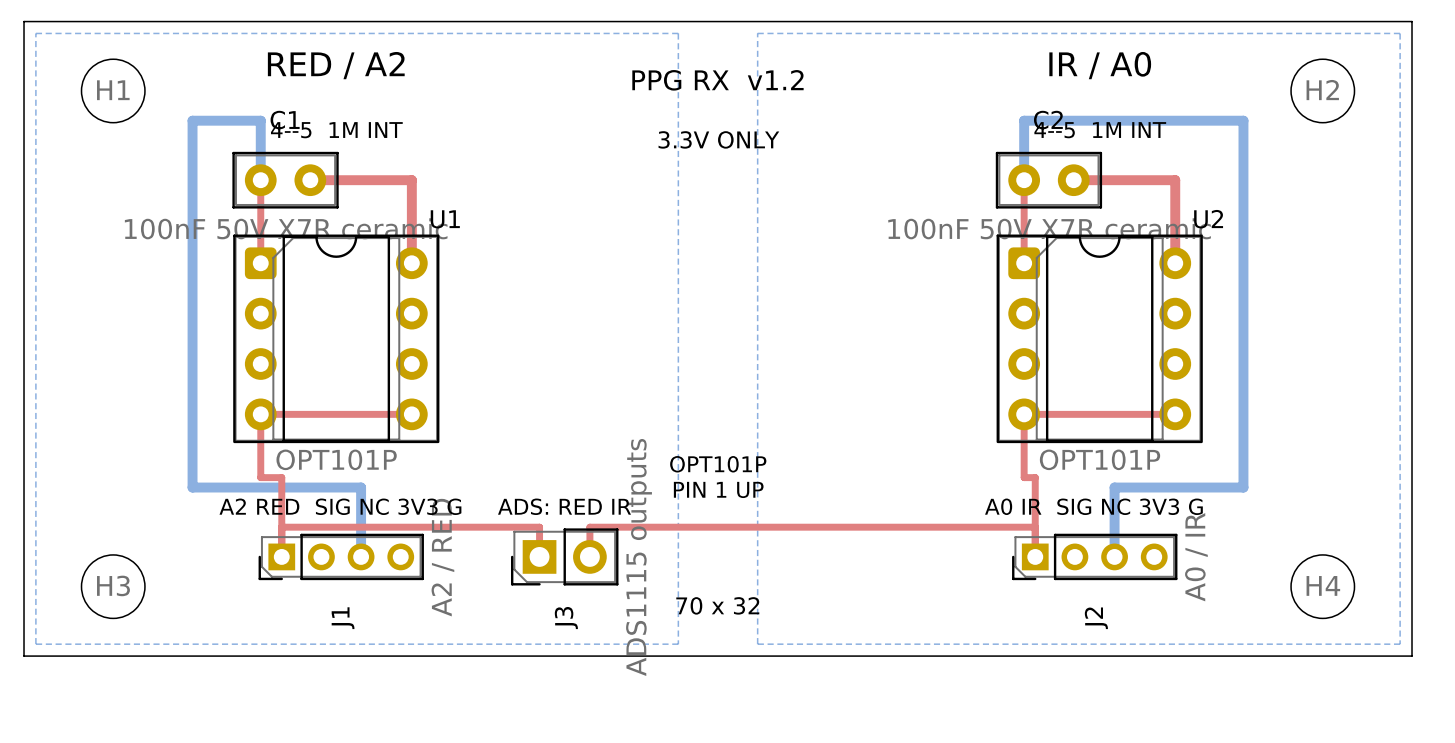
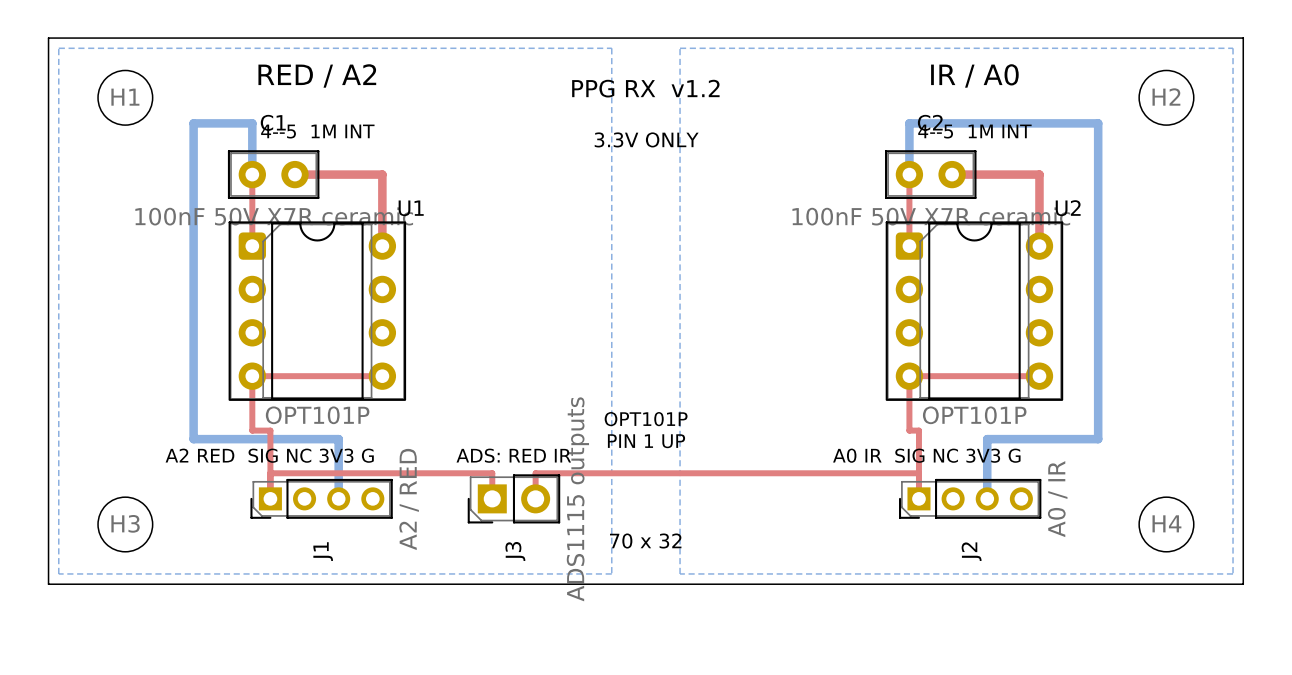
text position: A2 RED SIG NC 3V3 G (340, 506) -> A2 RED SIG NC 3V3 G (269, 455)
text position: A0 IR SIG NC 3V3 G (1093, 506) -> A0 IR SIG NC 3V3 G (926, 455)

